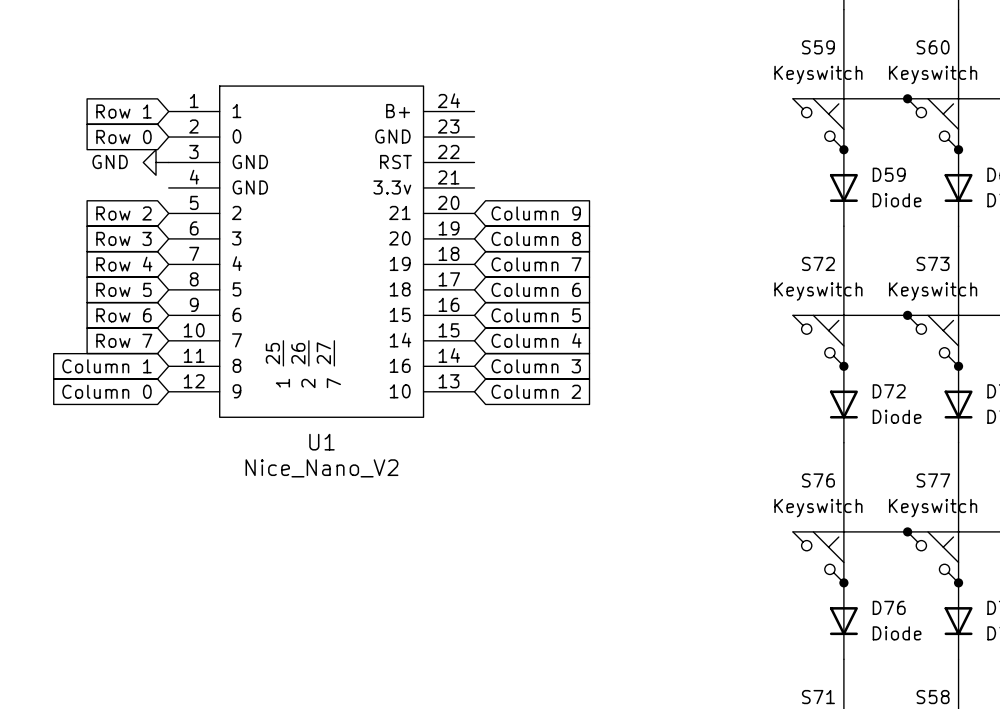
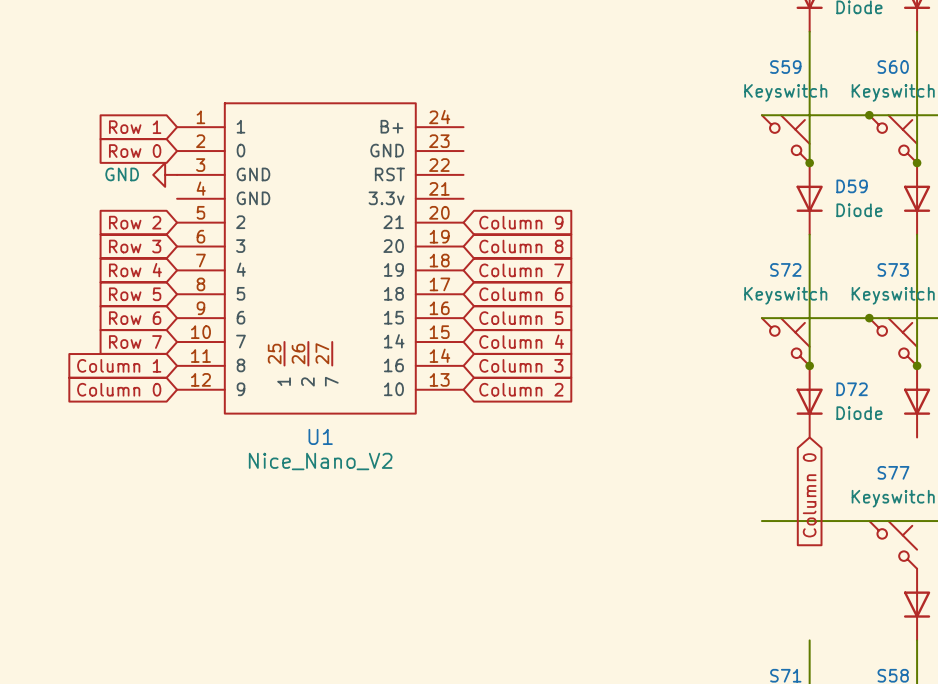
wire: (843, 442) (843, 582) -> none
wire: (958, 442) (958, 582) -> none
global label: none -> Column 0 (809, 495)
junction: (907, 531) -> none
S76: Keyswitch (818, 557) -> none
junction: (843, 582) -> none
junction: (958, 582) -> none
D76: Diode (843, 621) -> none

